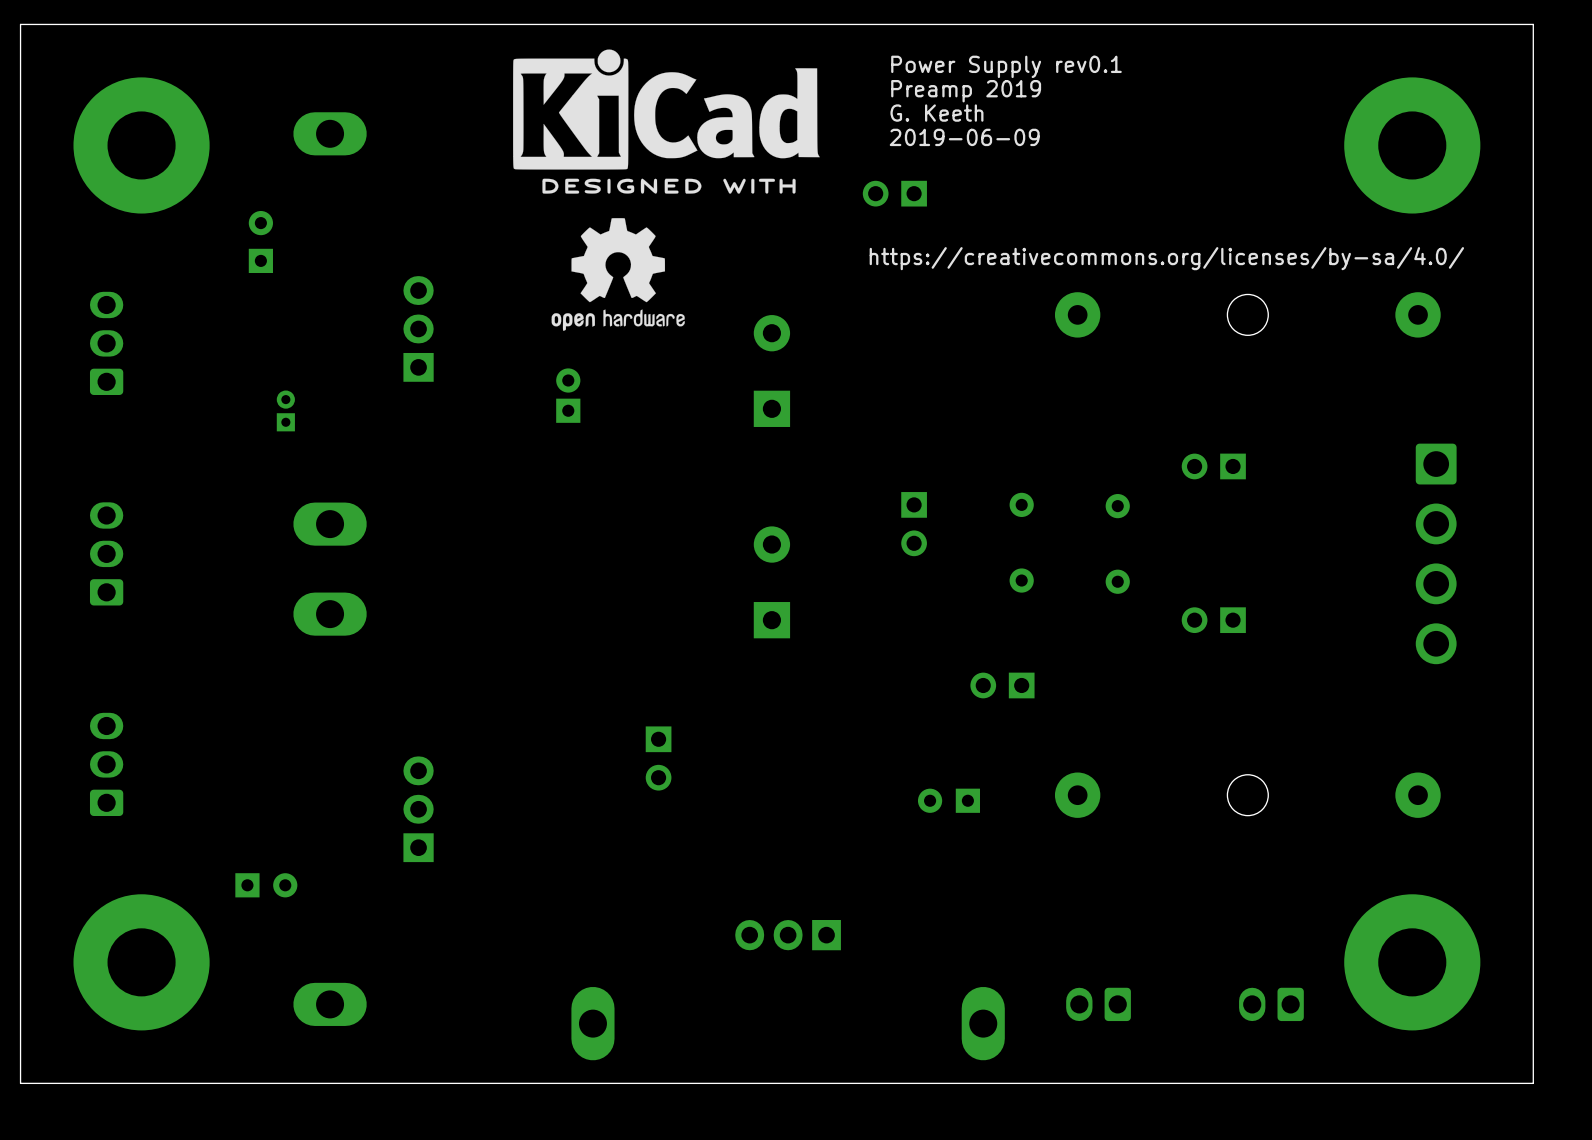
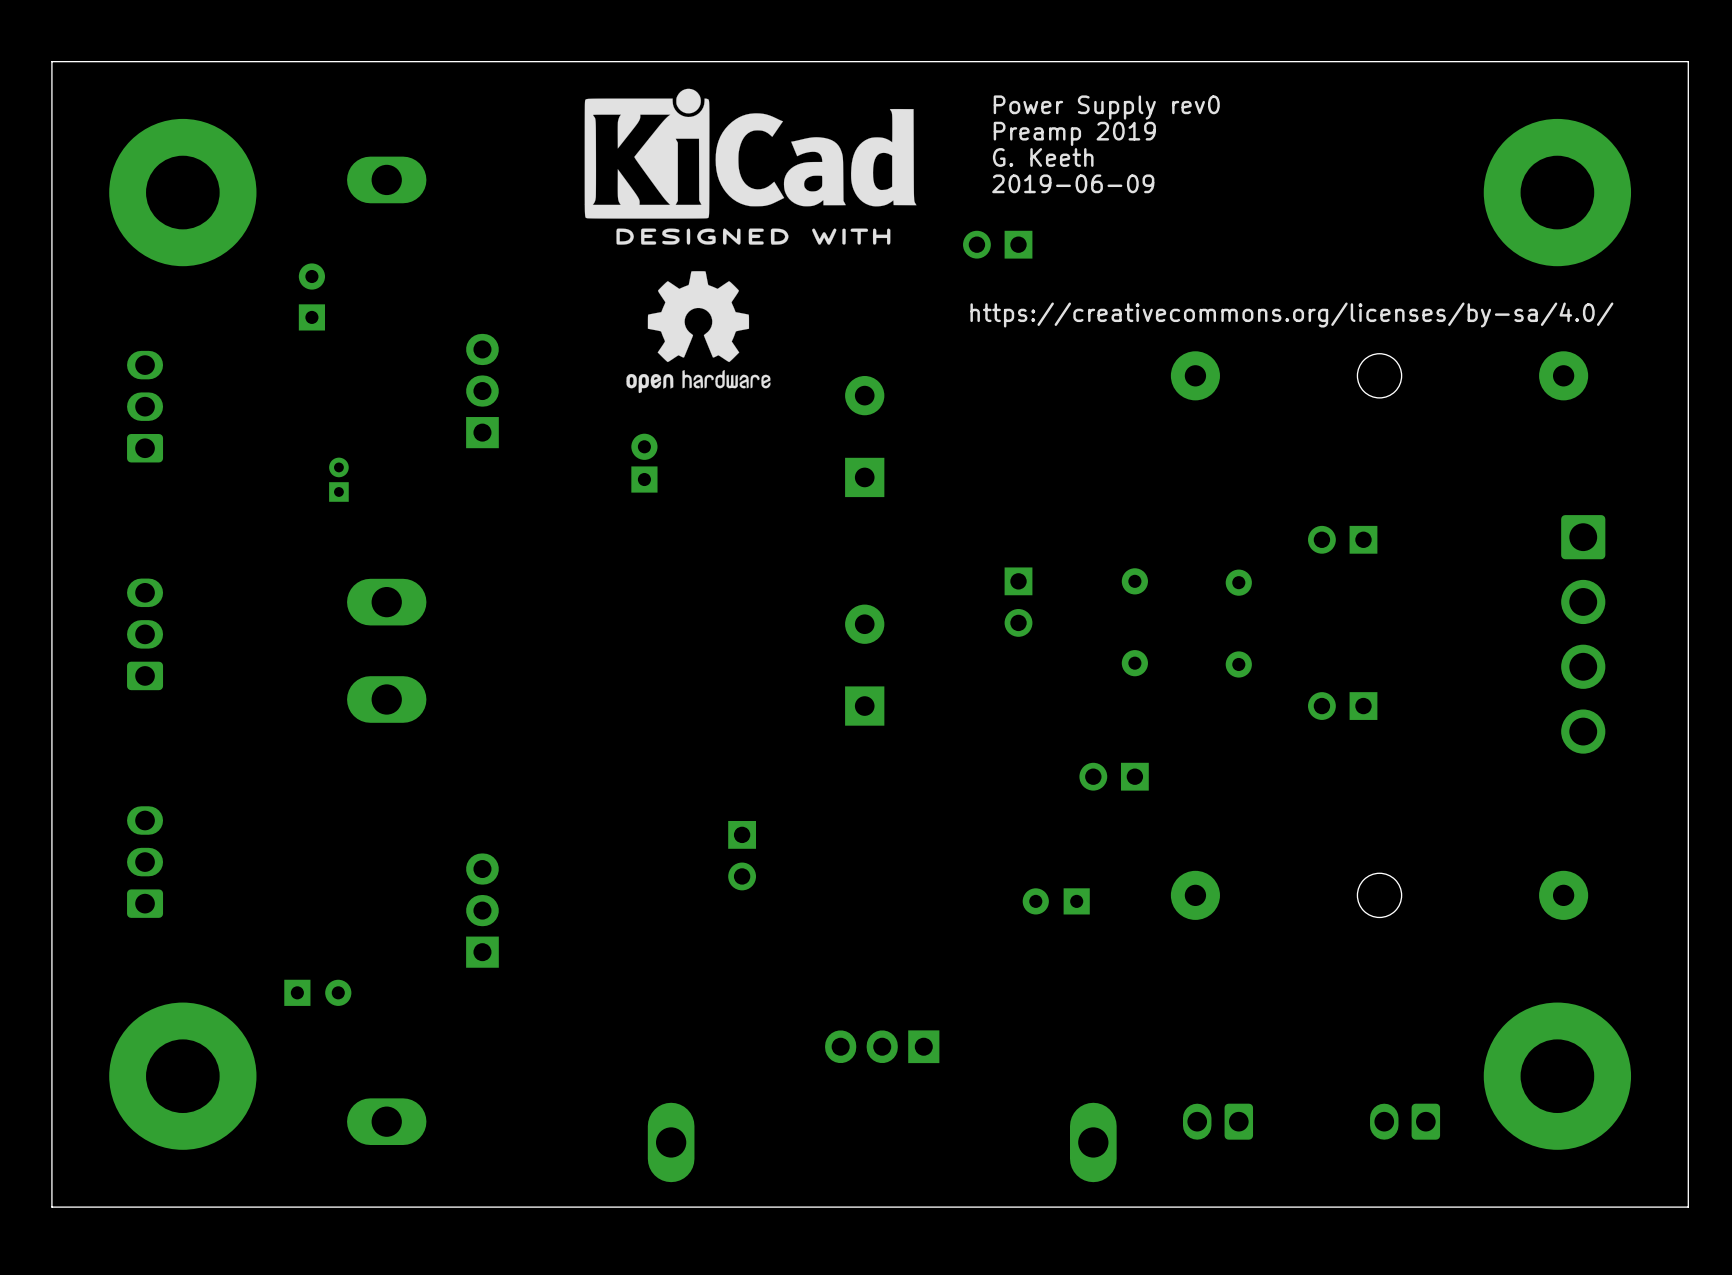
text: Power Supply rev0.1 (1006, 66) -> Power Supply rev0 (1106, 107)

